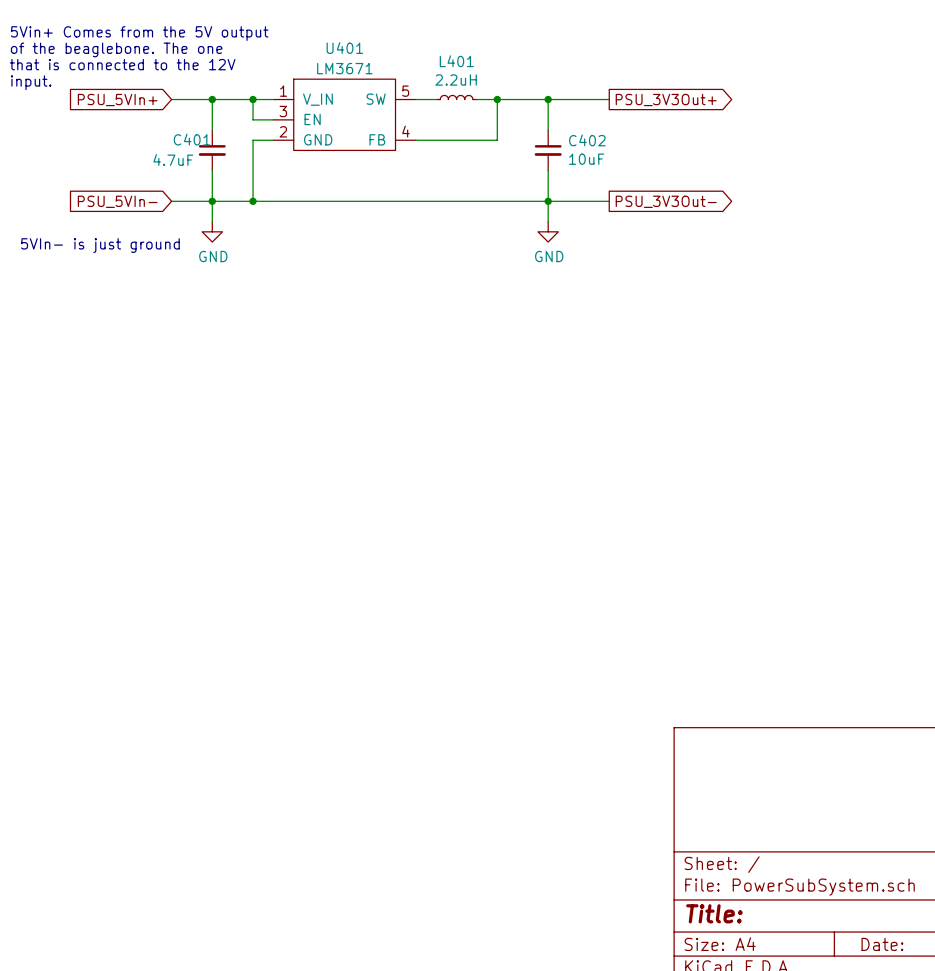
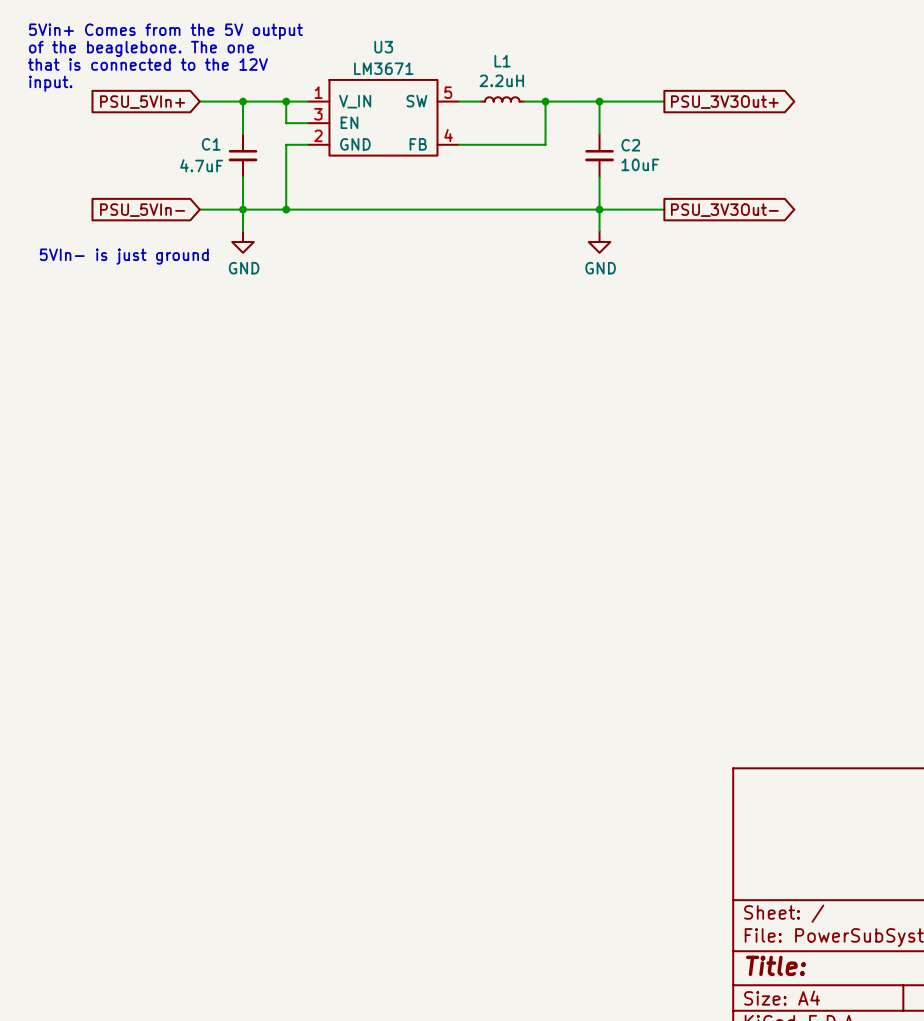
U401 name: U401 (344, 48) -> U3 (383, 47)
L401 name: L401 (456, 61) -> L1 (502, 61)
C401 name: C401 (192, 139) -> C1 (211, 144)
C402 name: C402 (587, 140) -> C2 (630, 145)

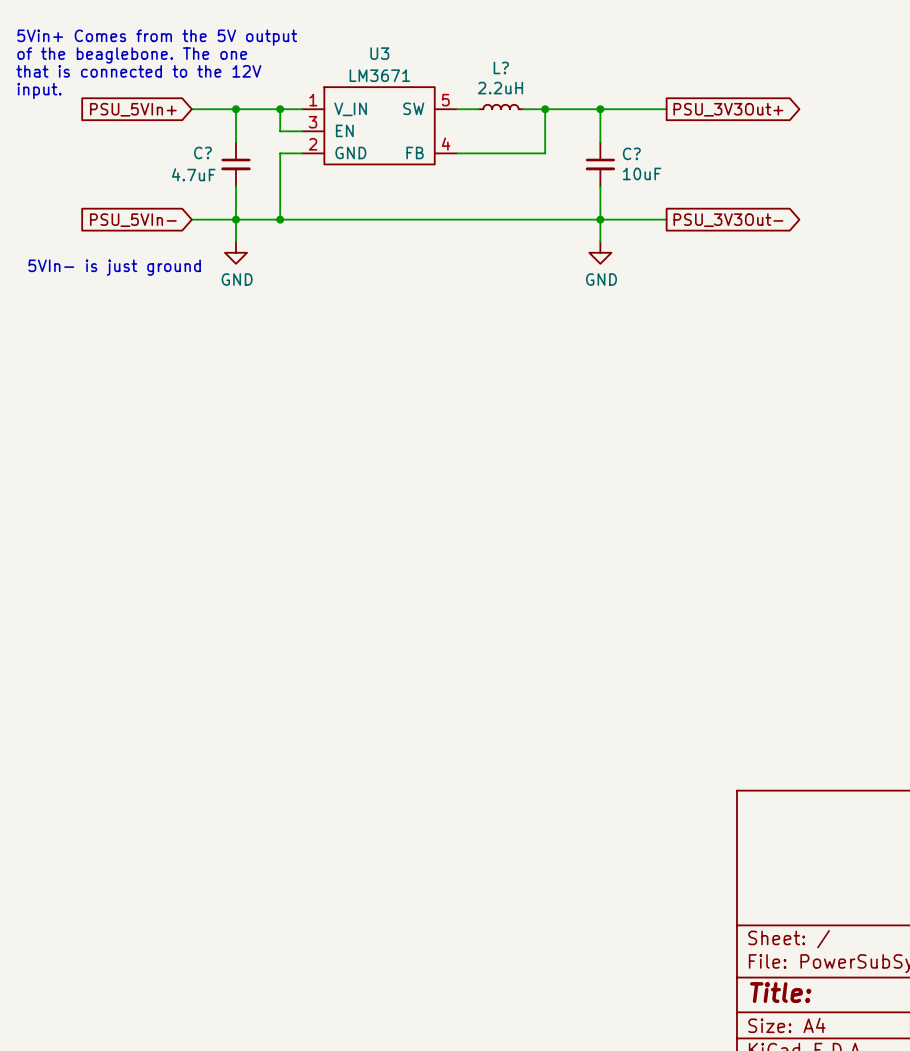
L1 name: L1 (502, 61) -> L? (501, 67)
C1 name: C1 (211, 144) -> C? (202, 152)
C2 name: C2 (630, 145) -> C? (631, 153)

